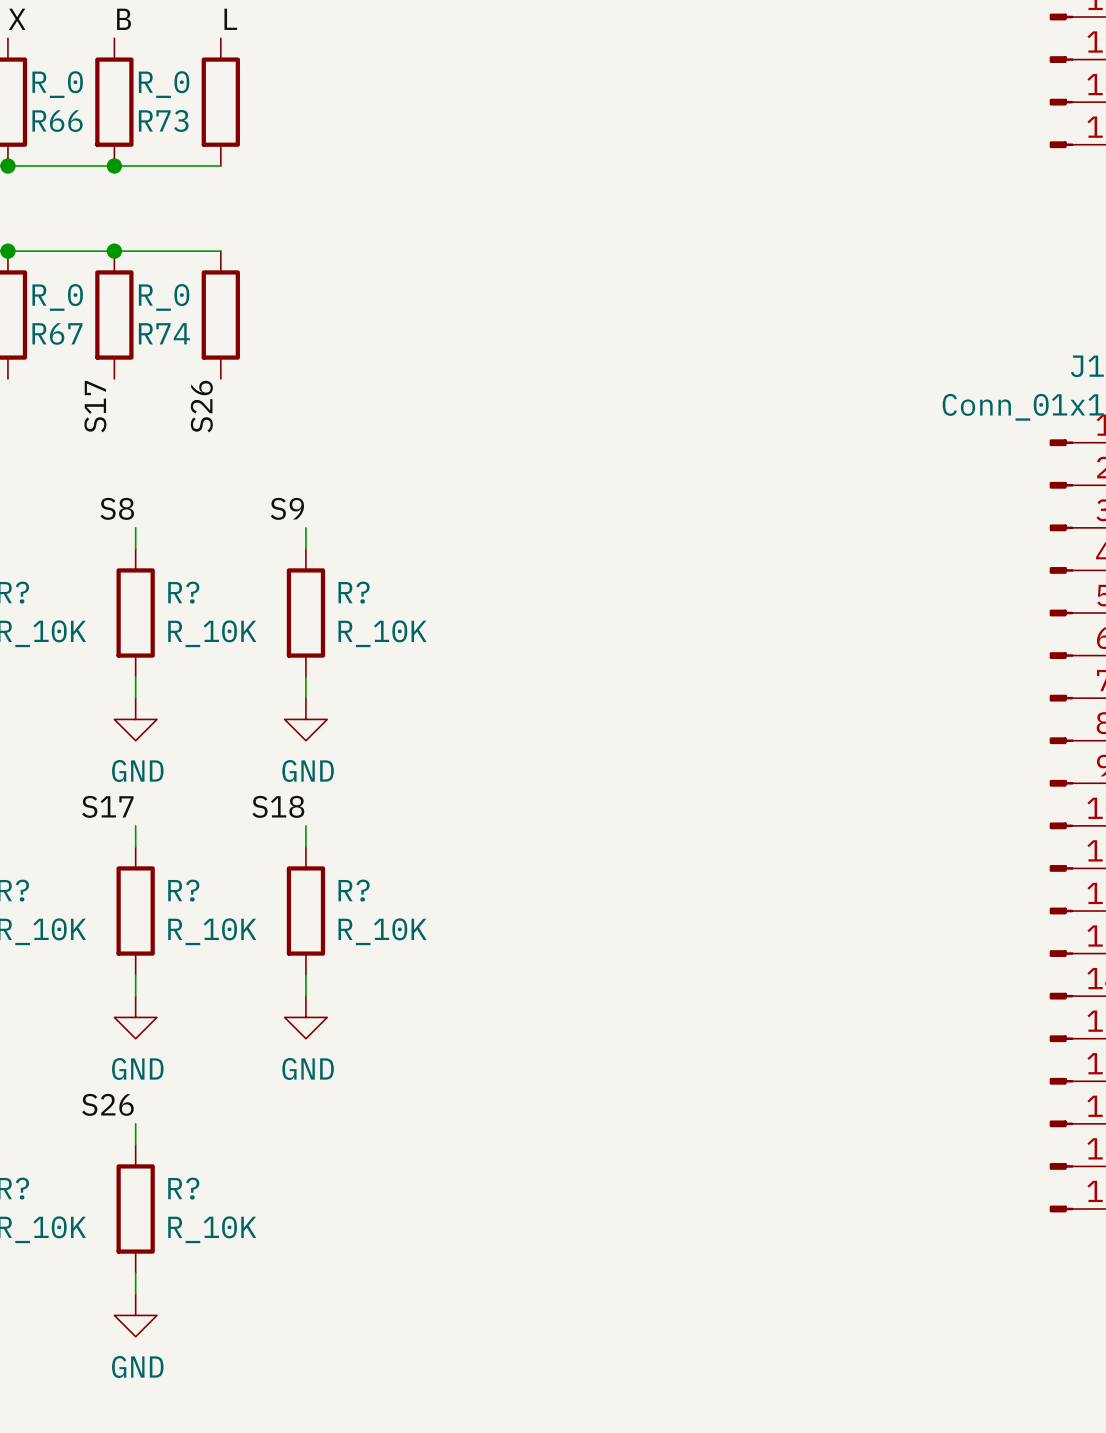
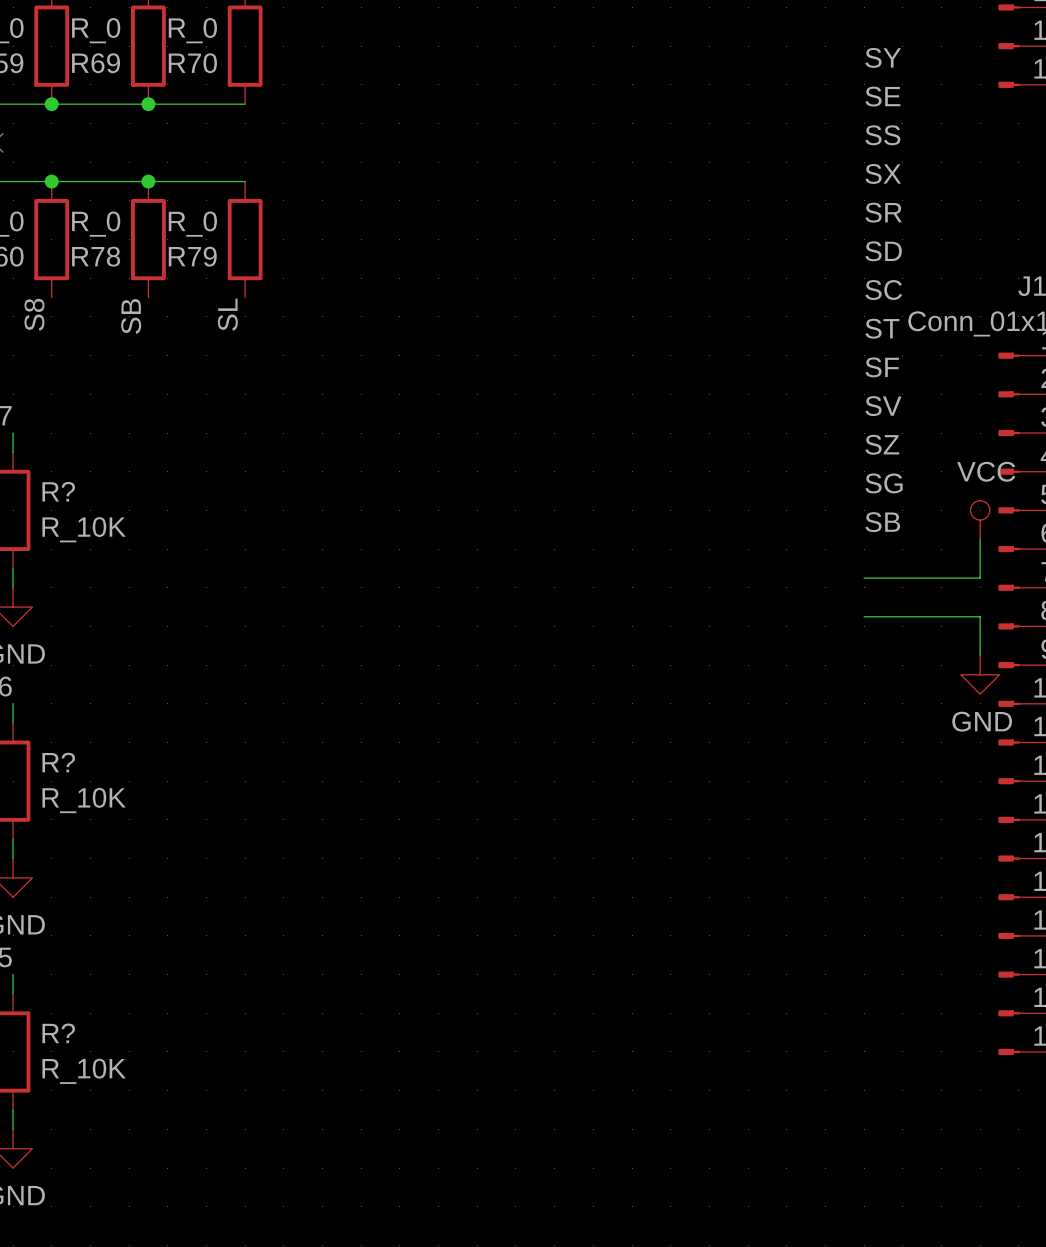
label: none -> SY (883, 57)
R73 name: R73 (163, 120) -> R70 (192, 63)
R66 name: R66 (57, 121) -> R69 (96, 63)
label: none -> SE (882, 96)
label: none -> SS (882, 135)
label: none -> SX (883, 173)
label: none -> SR (883, 212)
label: none -> SD (883, 251)
R67 name: R67 (57, 333) -> R78 (96, 256)
R74 name: R74 (164, 333) -> R79 (192, 256)
label: none -> SC (883, 290)
label: S17 (95, 406) -> SB (131, 316)
label: S26 (201, 406) -> SL (227, 314)
label: none -> ST (882, 328)
label: none -> SF (882, 367)
label: none -> SV (883, 406)
label: S8 (117, 508) -> none
label: S9 (287, 508) -> none
wire: (135, 527) (135, 549) -> none
wire: (305, 527) (305, 549) -> none
label: none -> SZ (882, 444)
label: none -> SG (884, 483)
R?: R_10K (135, 613) -> none
R?: R_10K (305, 613) -> none
power symbol: none -> VCC (980, 520)
label: none -> SB (882, 522)
wire: none -> (980, 539) (980, 578) (864, 578)
wire: (135, 676) (135, 698) -> none
wire: (305, 676) (305, 698) -> none
power symbol: GND (135, 719) -> none
power symbol: GND (305, 719) -> none
wire: none -> (864, 616) (980, 616) (980, 655)
power symbol: none -> GND (980, 674)
label: S17 (107, 806) -> none
label: S18 (278, 806) -> none
wire: (135, 825) (135, 847) -> none
wire: (305, 825) (305, 847) -> none
R?: R_10K (135, 911) -> none
R?: R_10K (305, 911) -> none
wire: (135, 974) (135, 996) -> none
wire: (305, 974) (305, 996) -> none
power symbol: GND (135, 1017) -> none
power symbol: GND (305, 1017) -> none
label: S26 (107, 1104) -> none
wire: (135, 1123) (135, 1145) -> none
R?: R_10K (135, 1209) -> none
wire: (135, 1272) (135, 1294) -> none
power symbol: GND (135, 1315) -> none

